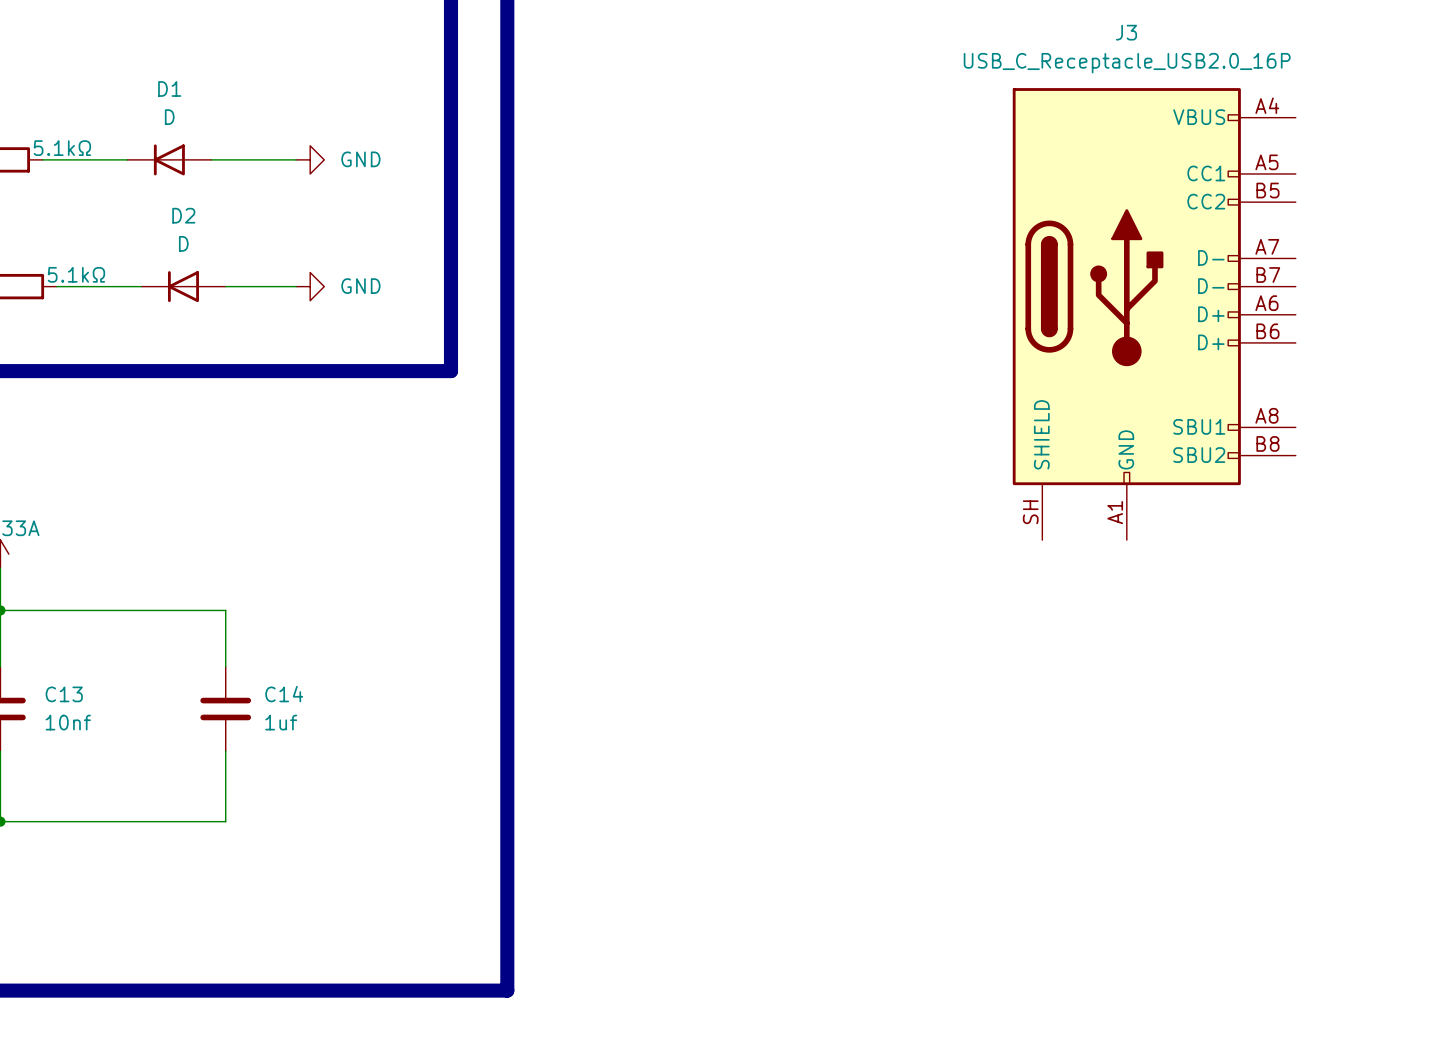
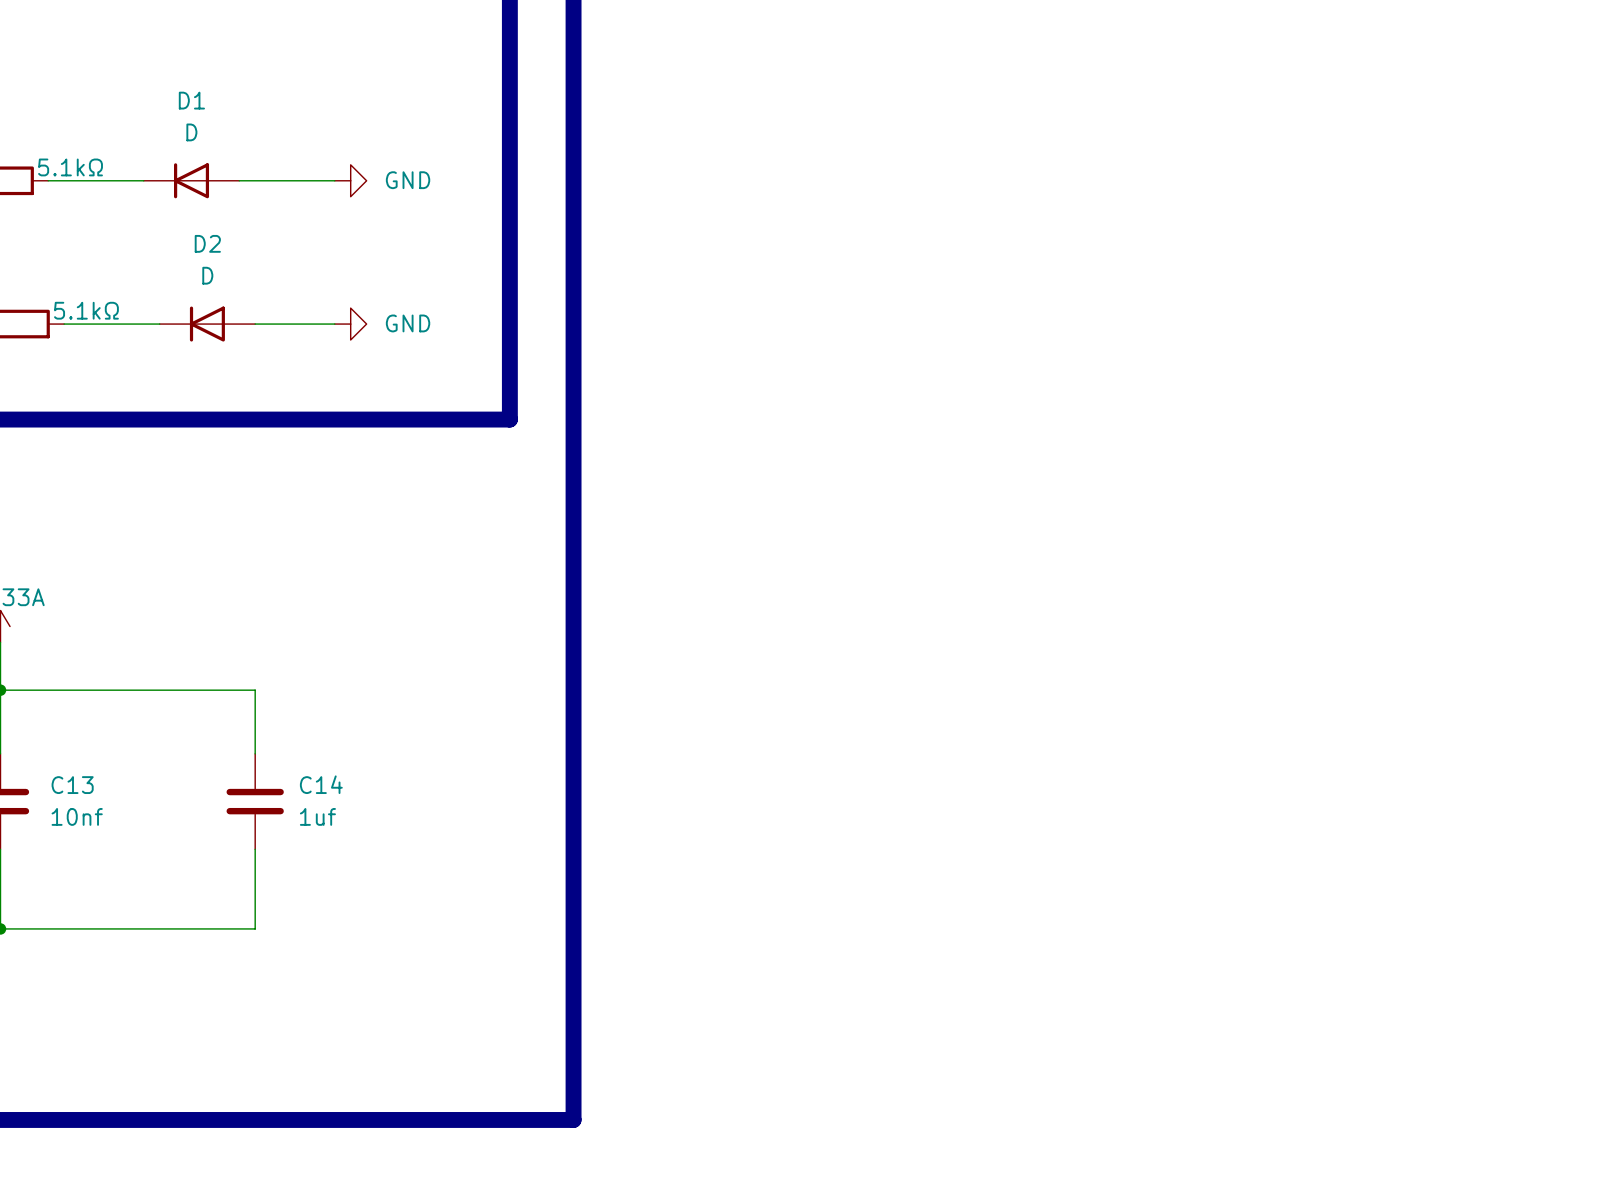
J3: USB_C_Receptacle_USB2.0_16P (1154, 314) -> none

